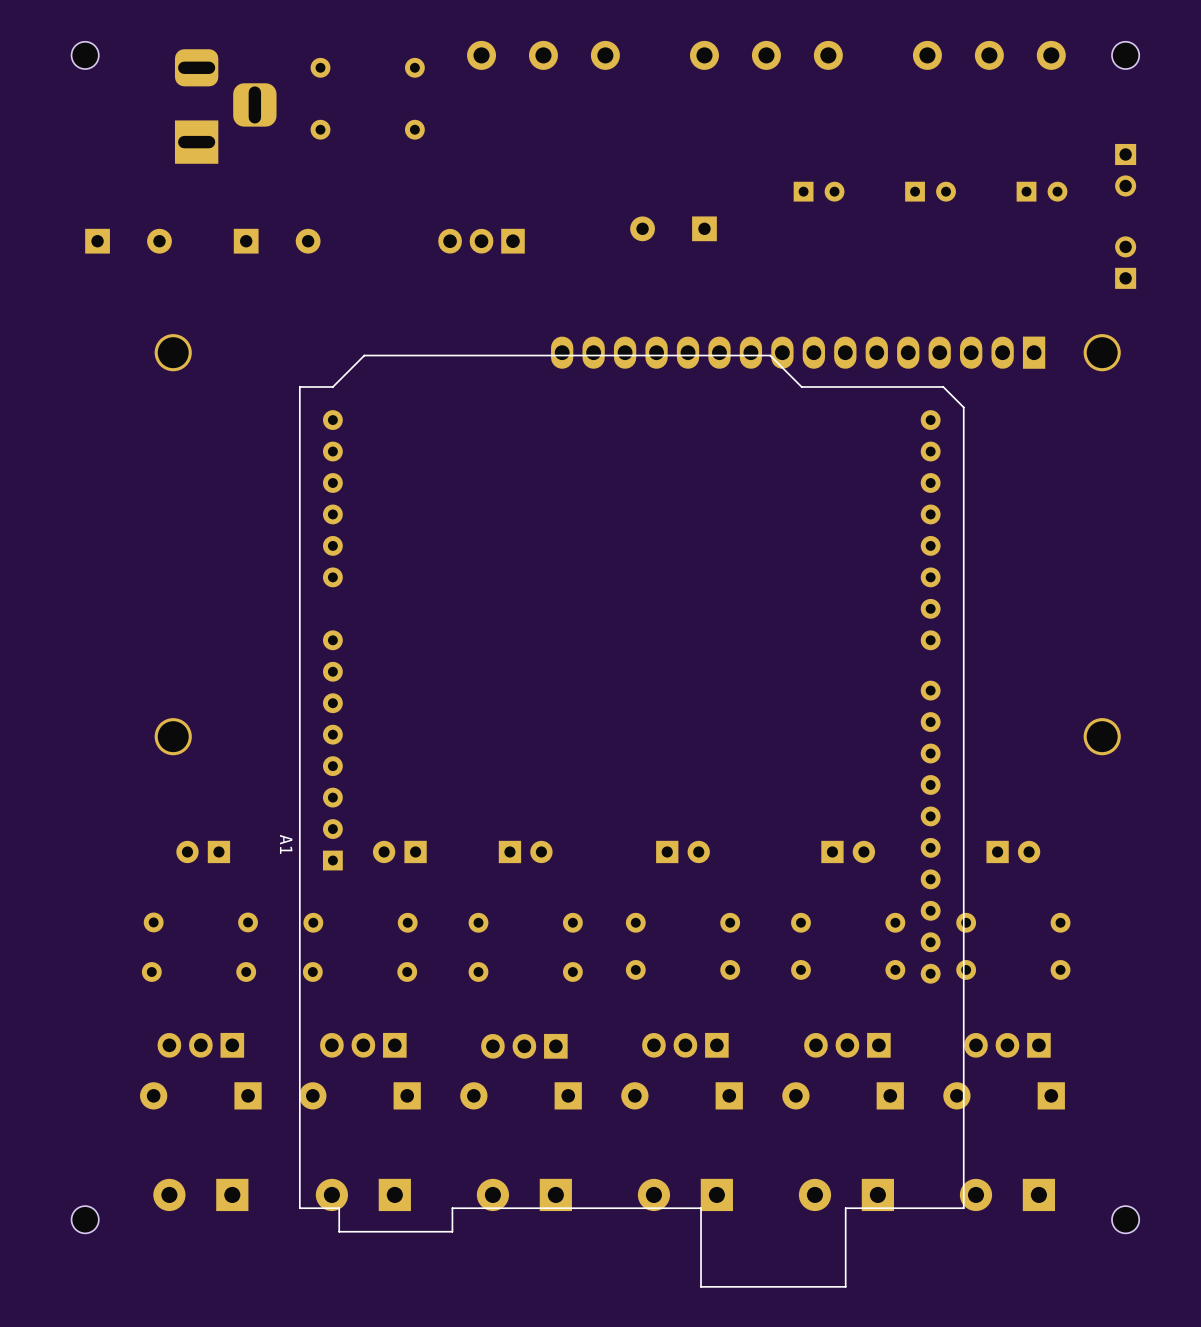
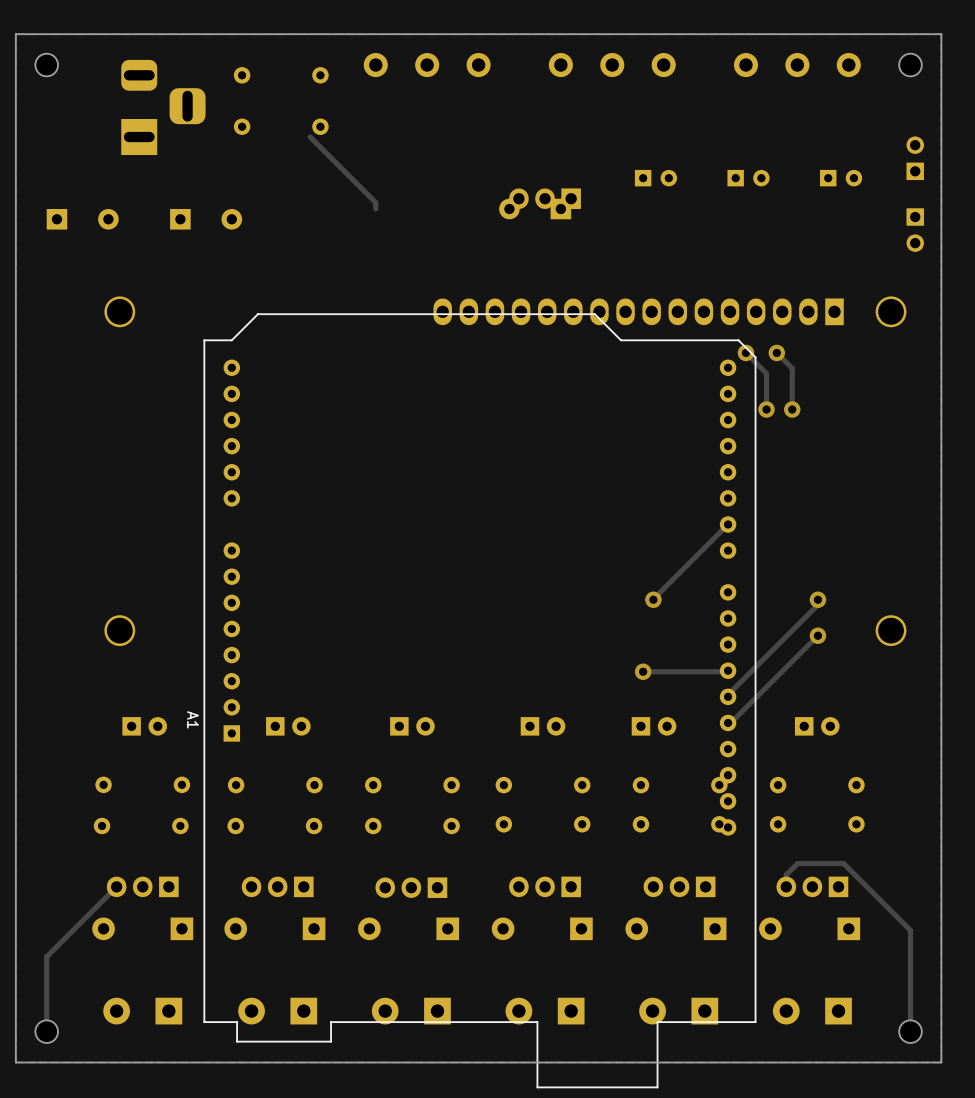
board edge: none -> (941, 34) (15, 34) (15, 1062) (941, 1062) (941, 34)
track: none -> (310, 137) (375, 202) (375, 209)
part rotation: 0° (1125, 170) -> 180° (915, 158)
part position: (481, 241) -> (545, 198)
part rotation: 0° (1125, 262) -> 180° (915, 230)
track: none -> (745, 352) (766, 373) (766, 409)
via: none -> (745, 352)
track: none -> (776, 352) (792, 368) (792, 409)
via: none -> (776, 352)
via: none -> (766, 409)
via: none -> (792, 409)
track: none -> (728, 524) (653, 599)
via: none -> (653, 599)
track: none -> (817, 599) (817, 604) (725, 697)
via: none -> (817, 599)
track: none -> (817, 635) (730, 723)
via: none -> (817, 635)
track: none -> (728, 670) (643, 671)
via: none -> (643, 671)
A1 position: (631, 821) -> (479, 700)
part rotation: 0° (203, 851) -> 180° (144, 726)
part rotation: 0° (399, 851) -> 180° (288, 726)
part position: (848, 851) -> (654, 726)
track: none -> (116, 886) (46, 956) (46, 1031)
track: none -> (786, 886) (786, 874) (797, 863) (843, 863) (910, 930) (910, 1031)

